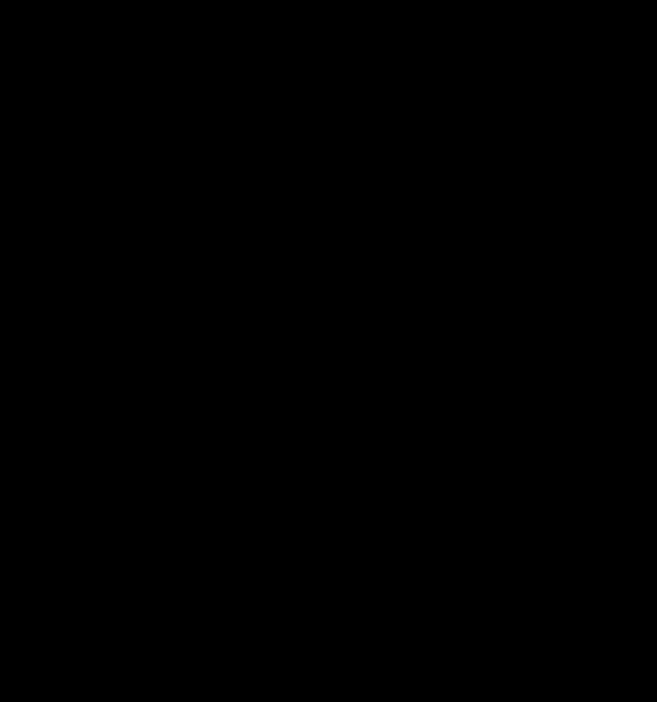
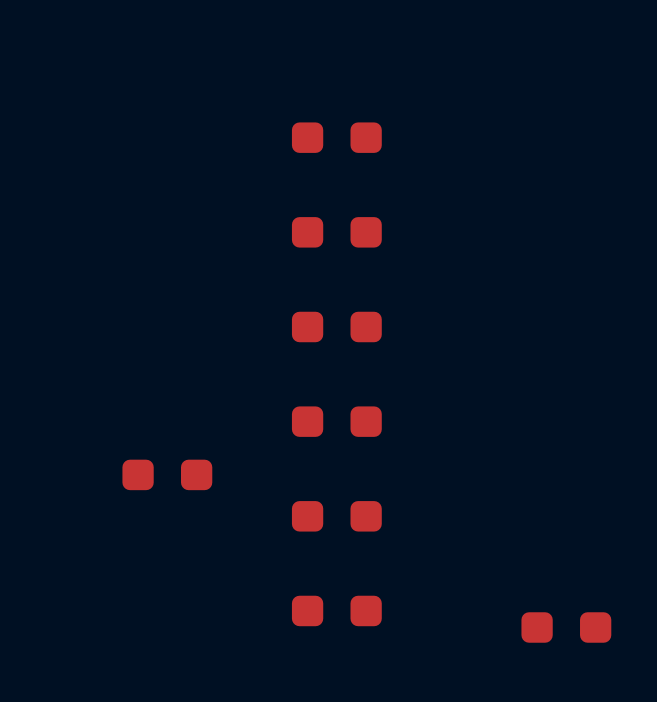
part: none -> (336, 137)
part: none -> (336, 232)
part: none -> (336, 326)
part: none -> (336, 421)
part: none -> (167, 474)
part: none -> (336, 516)
part: none -> (336, 610)
part: none -> (566, 627)

